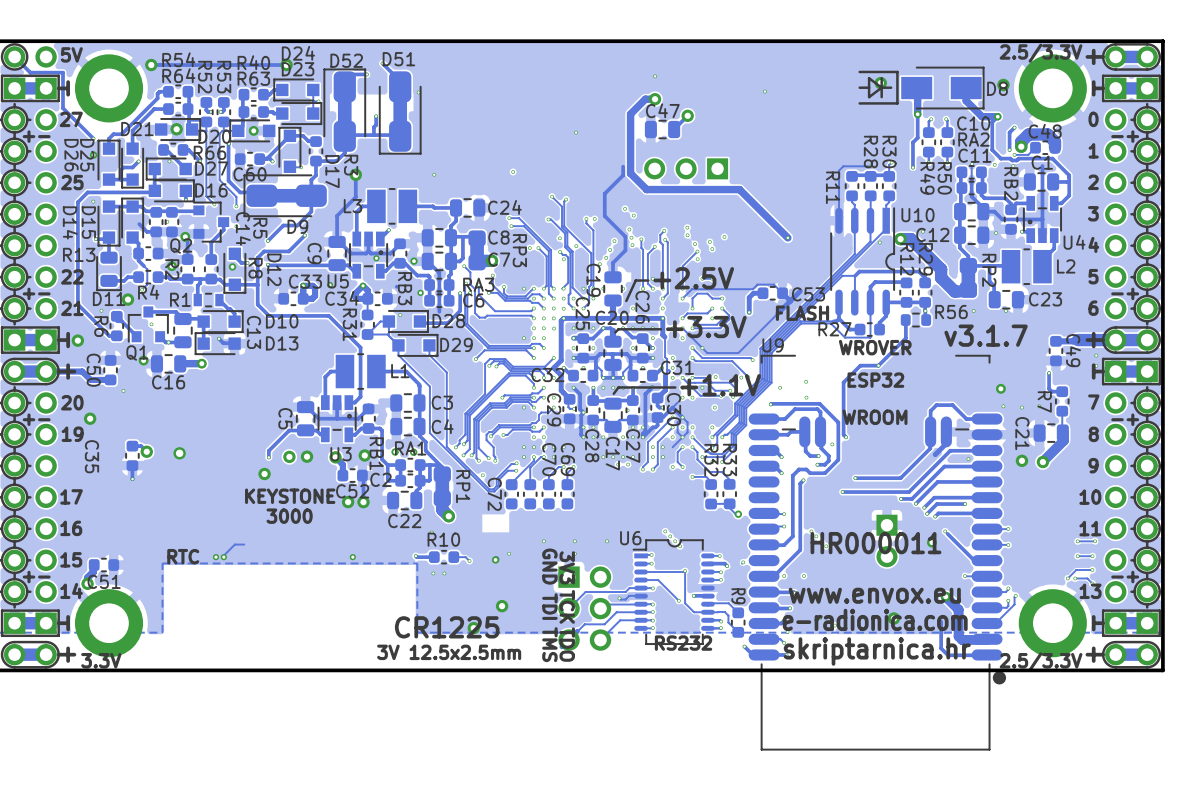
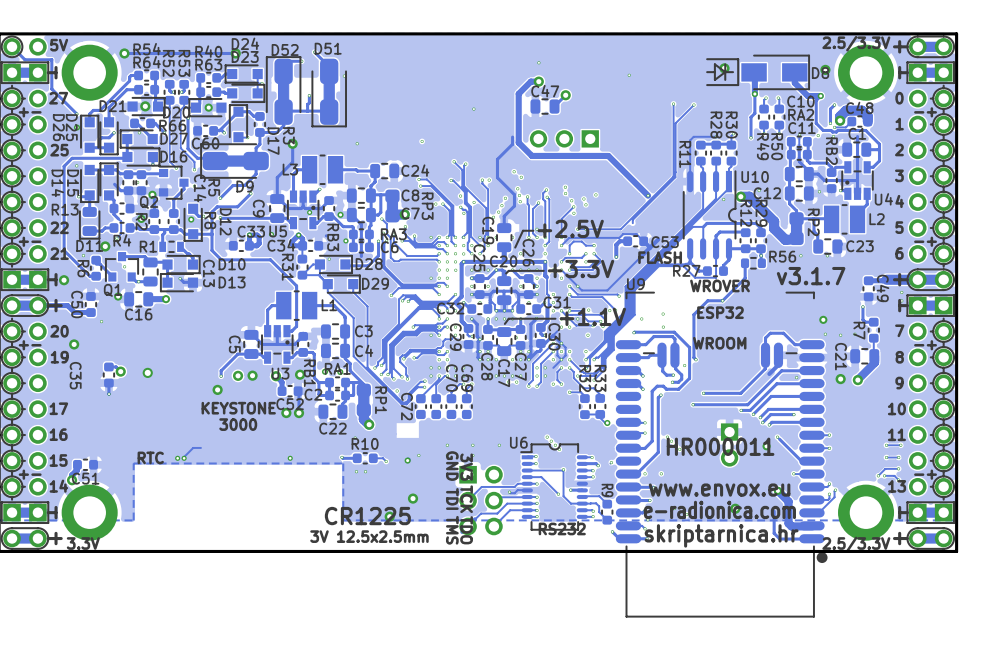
track: none -> (673, 103) (673, 176) (620, 229) (585, 229)
via: none -> (673, 103)
track: none -> (693, 105) (675, 123) (675, 177) (632, 219) (632, 223)
via: none -> (693, 105)

